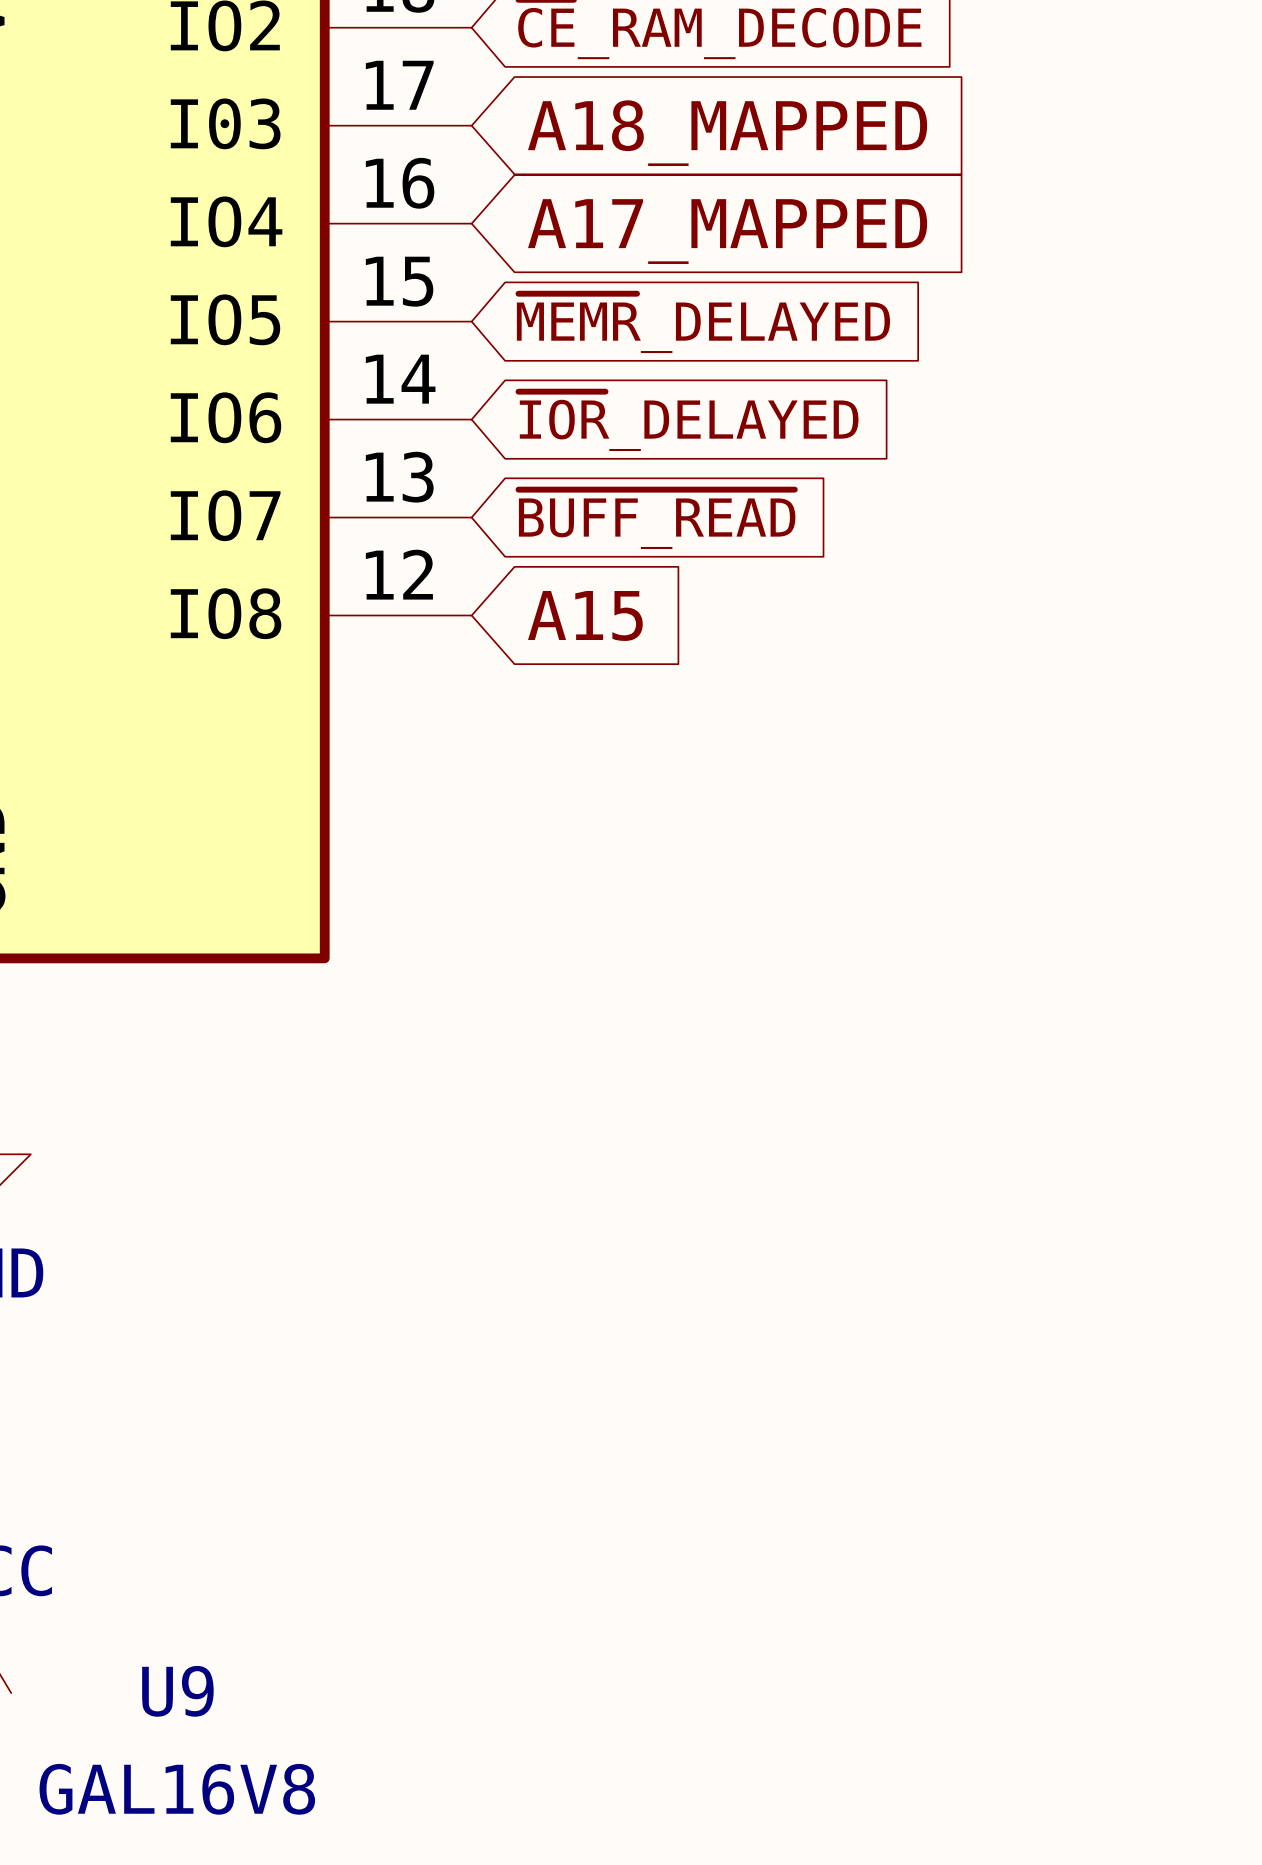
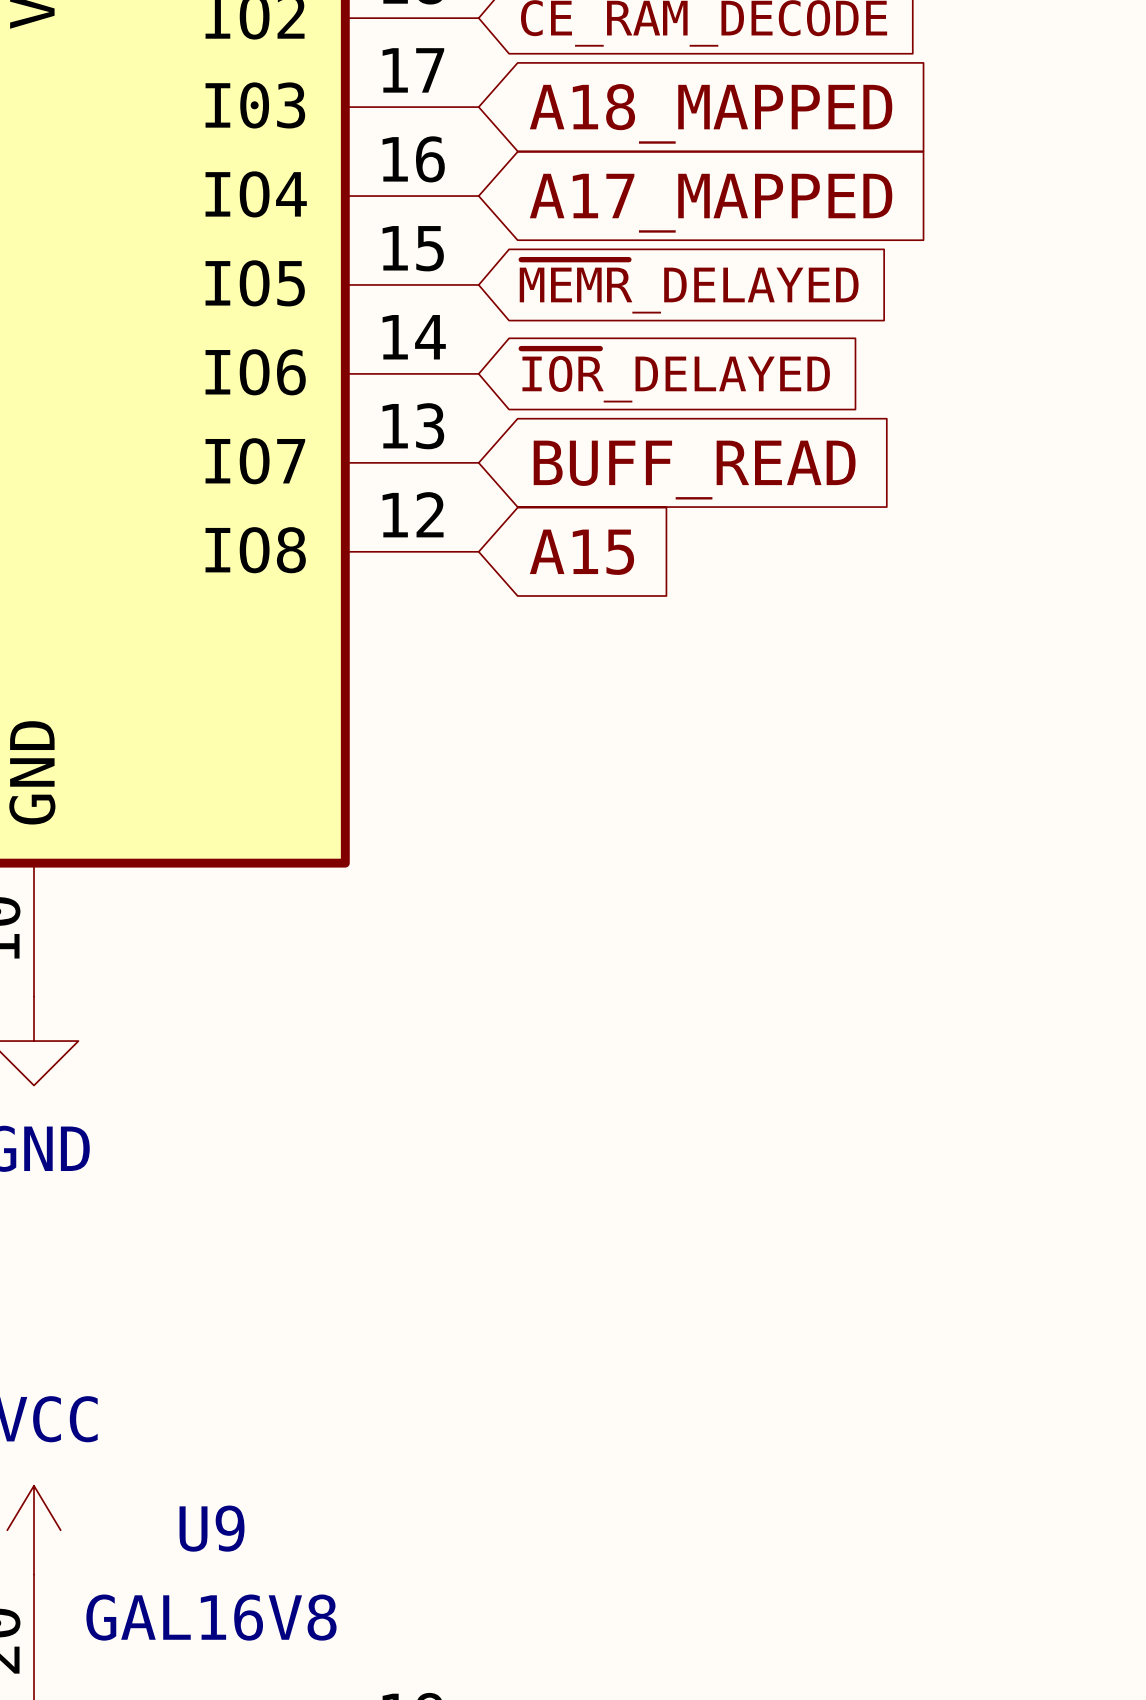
global label: ~{BUFF_READ} (656, 519) -> BUFF_READ (694, 470)

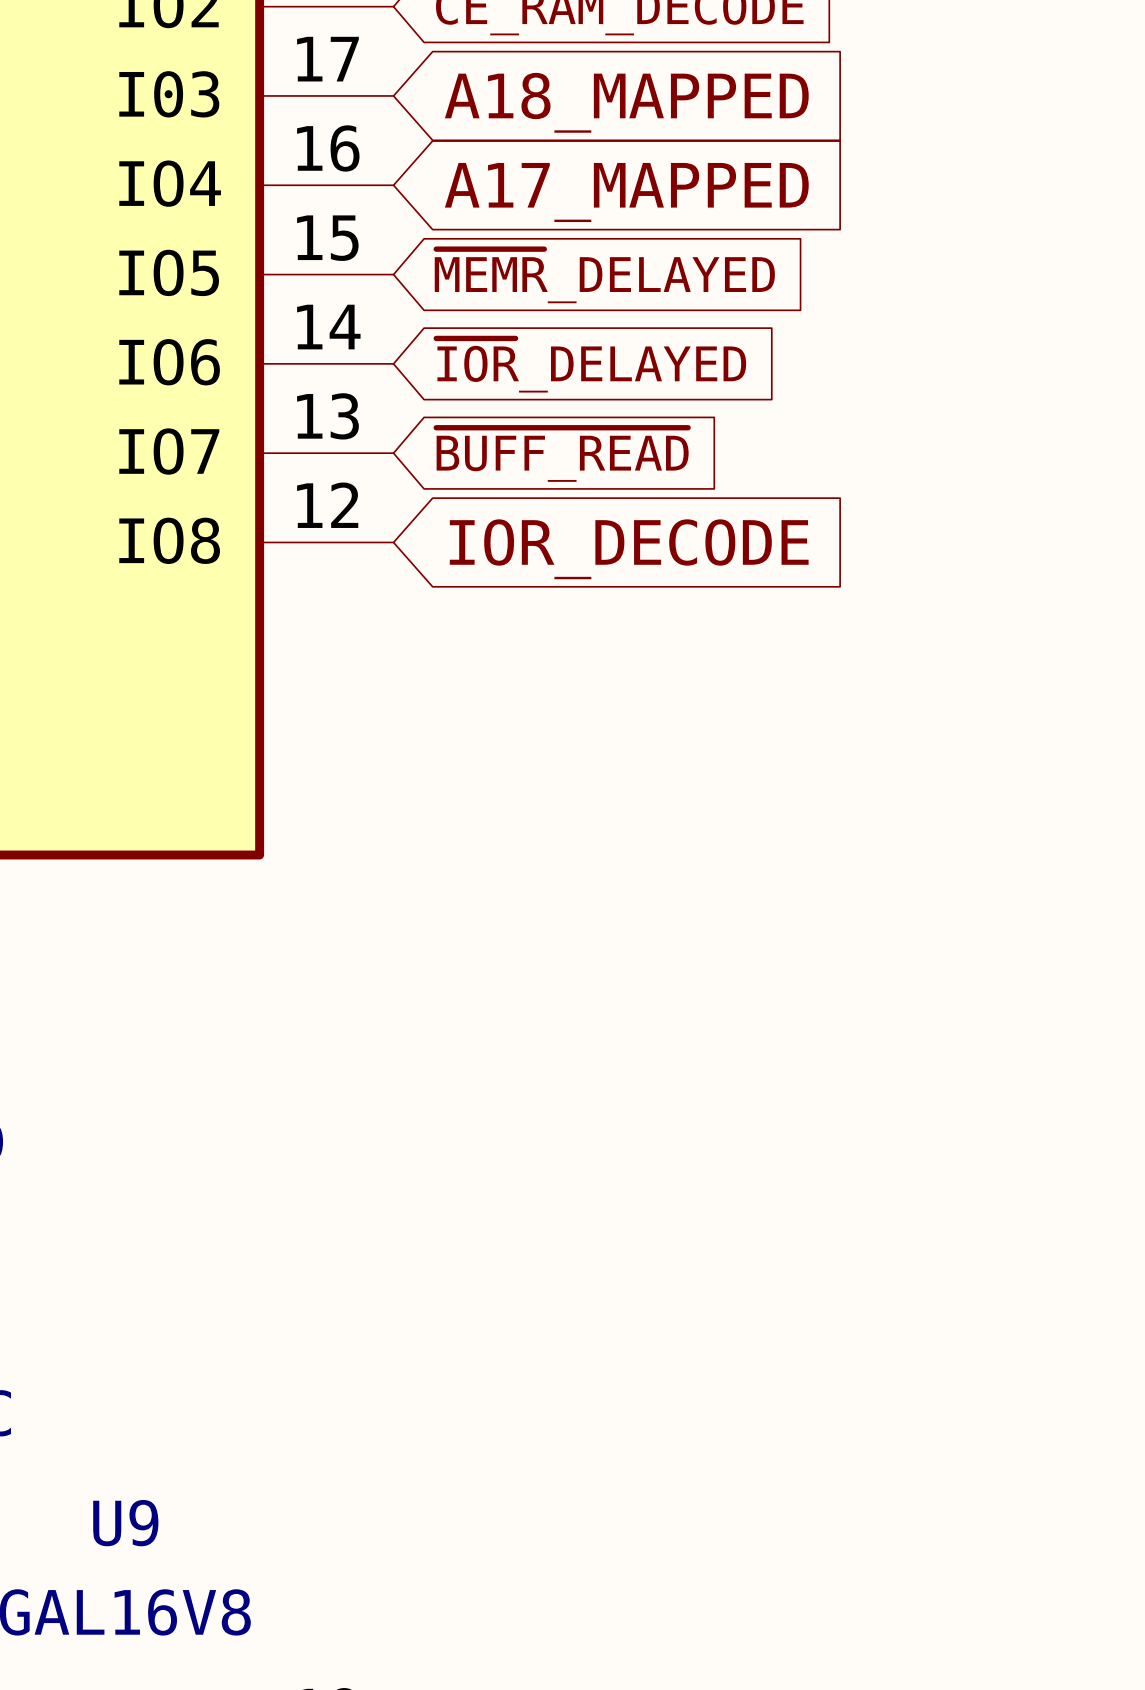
global label: BUFF_READ (694, 470) -> ~{BUFF_READ} (562, 454)
global label: A15 (581, 552) -> IOR_DECODE (629, 549)

